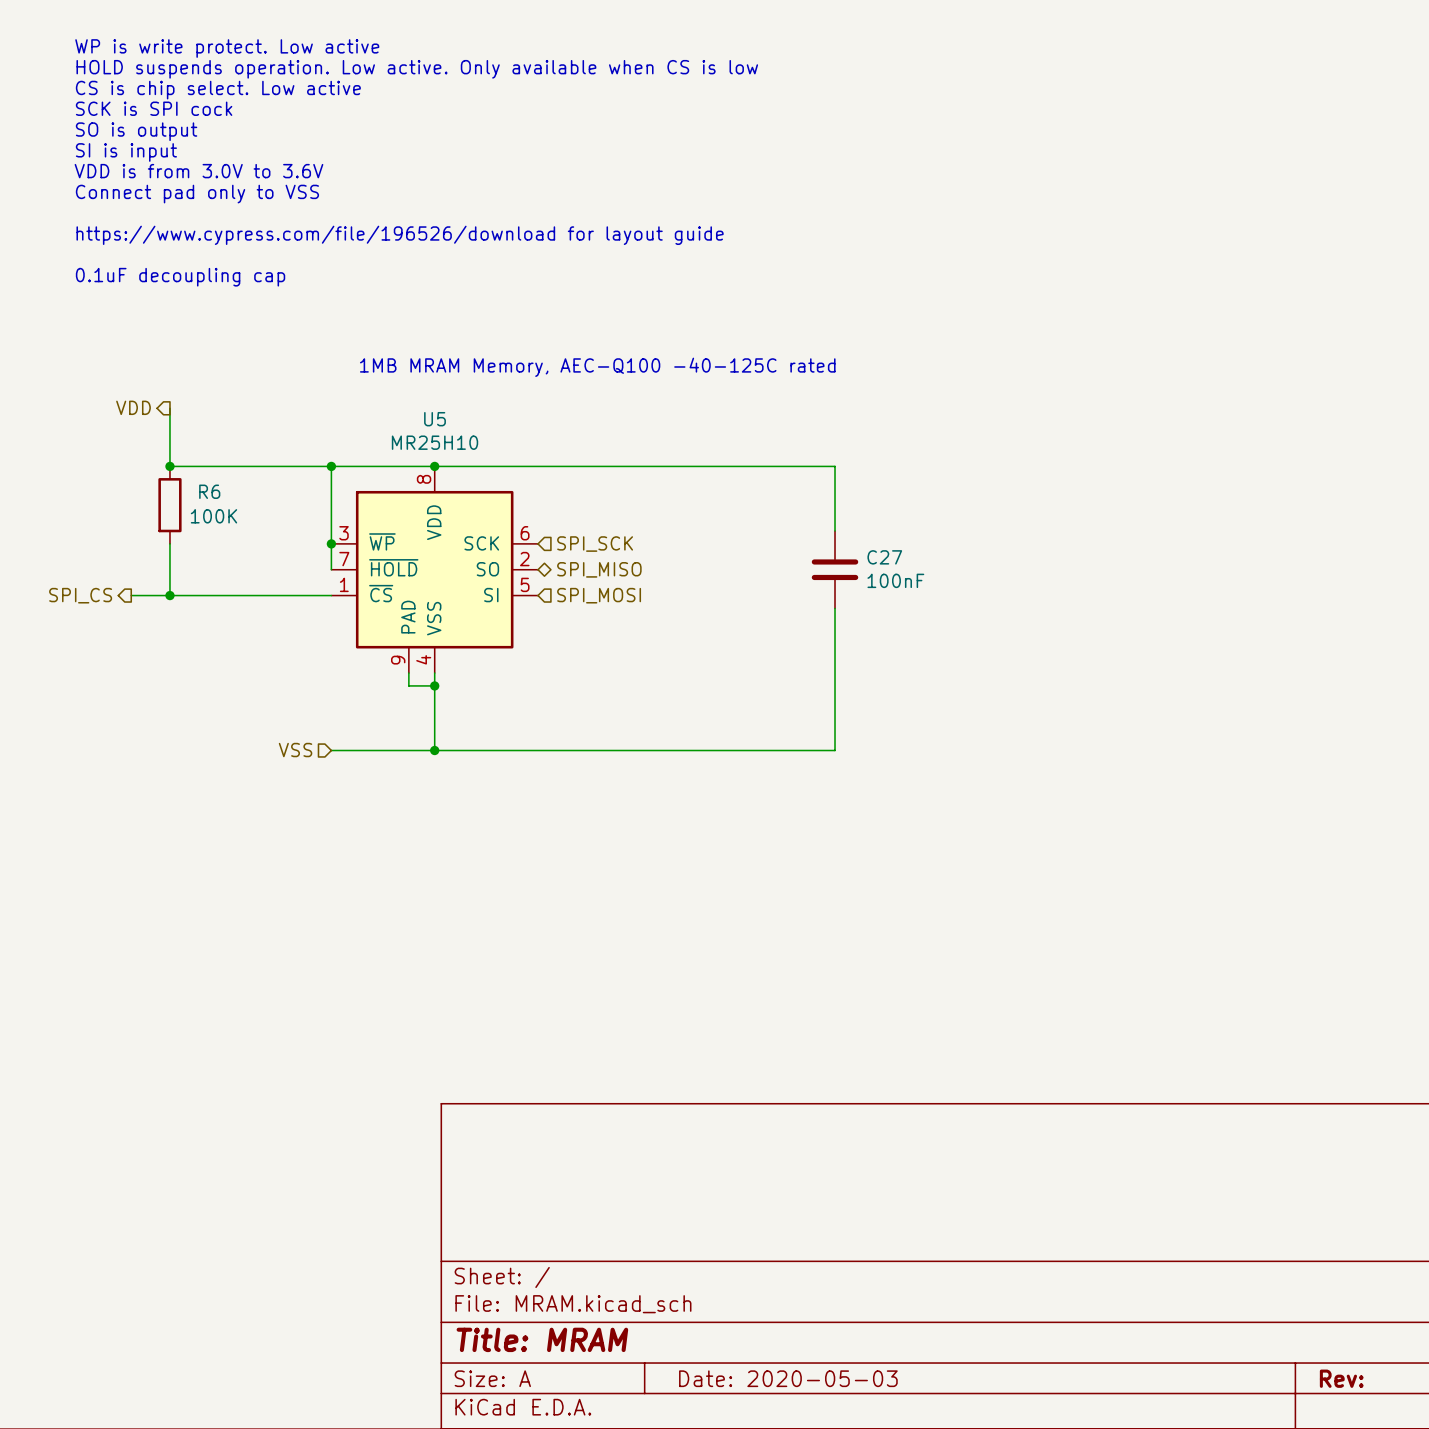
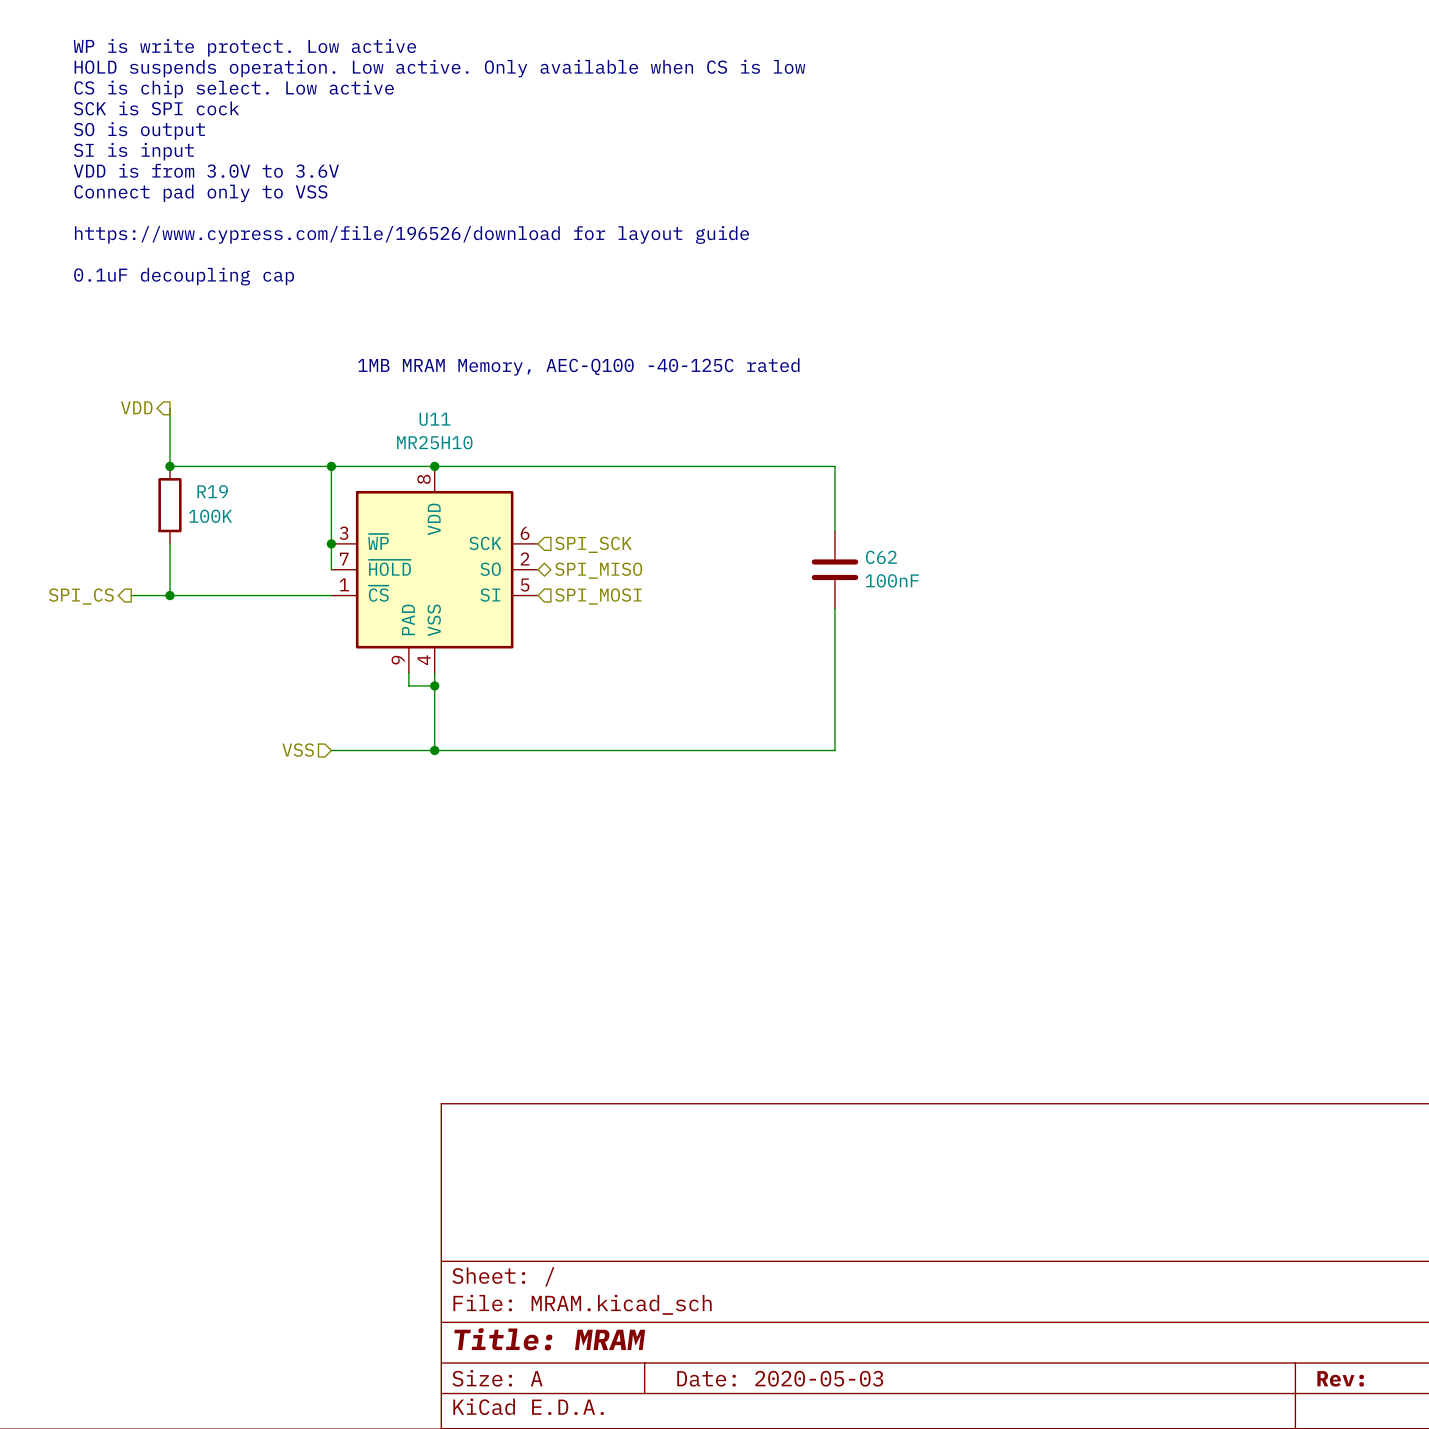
U5 name: U5 (435, 419) -> U11 (435, 419)
R6 name: R6 (209, 491) -> R19 (212, 491)
C27 name: C27 (884, 557) -> C62 (881, 557)

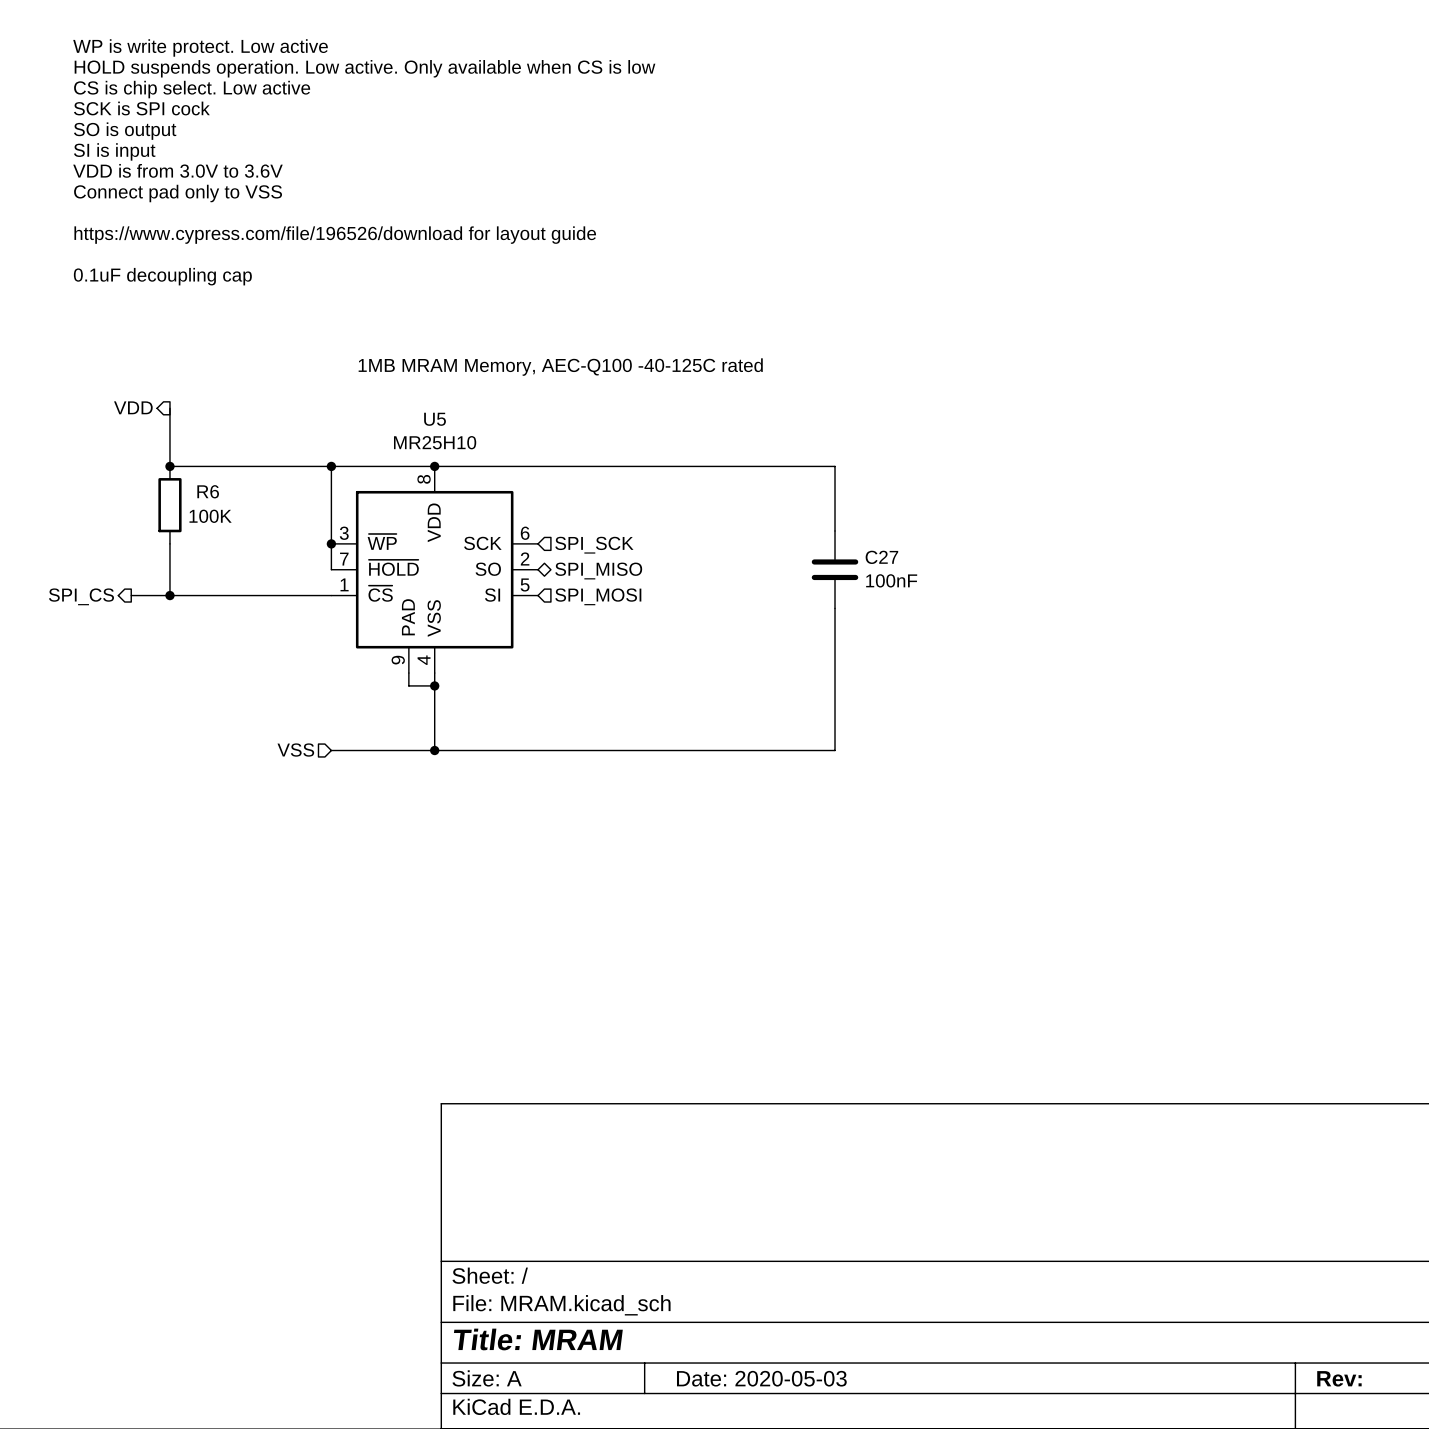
U11 name: U11 (435, 419) -> U5 (435, 419)
R19 name: R19 (212, 491) -> R6 (208, 491)
C62 name: C62 (881, 557) -> C27 (881, 557)

